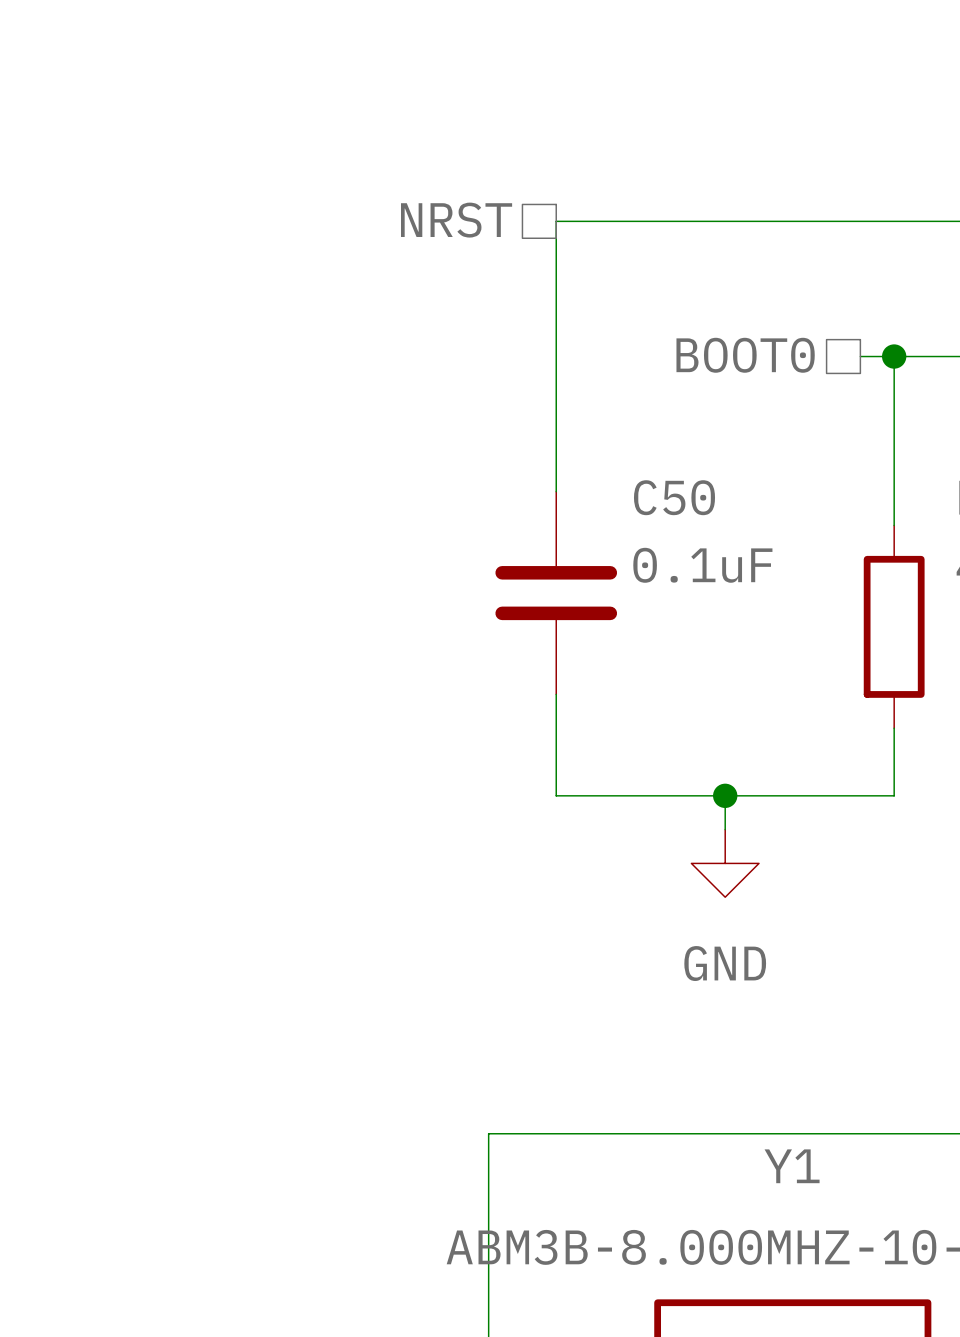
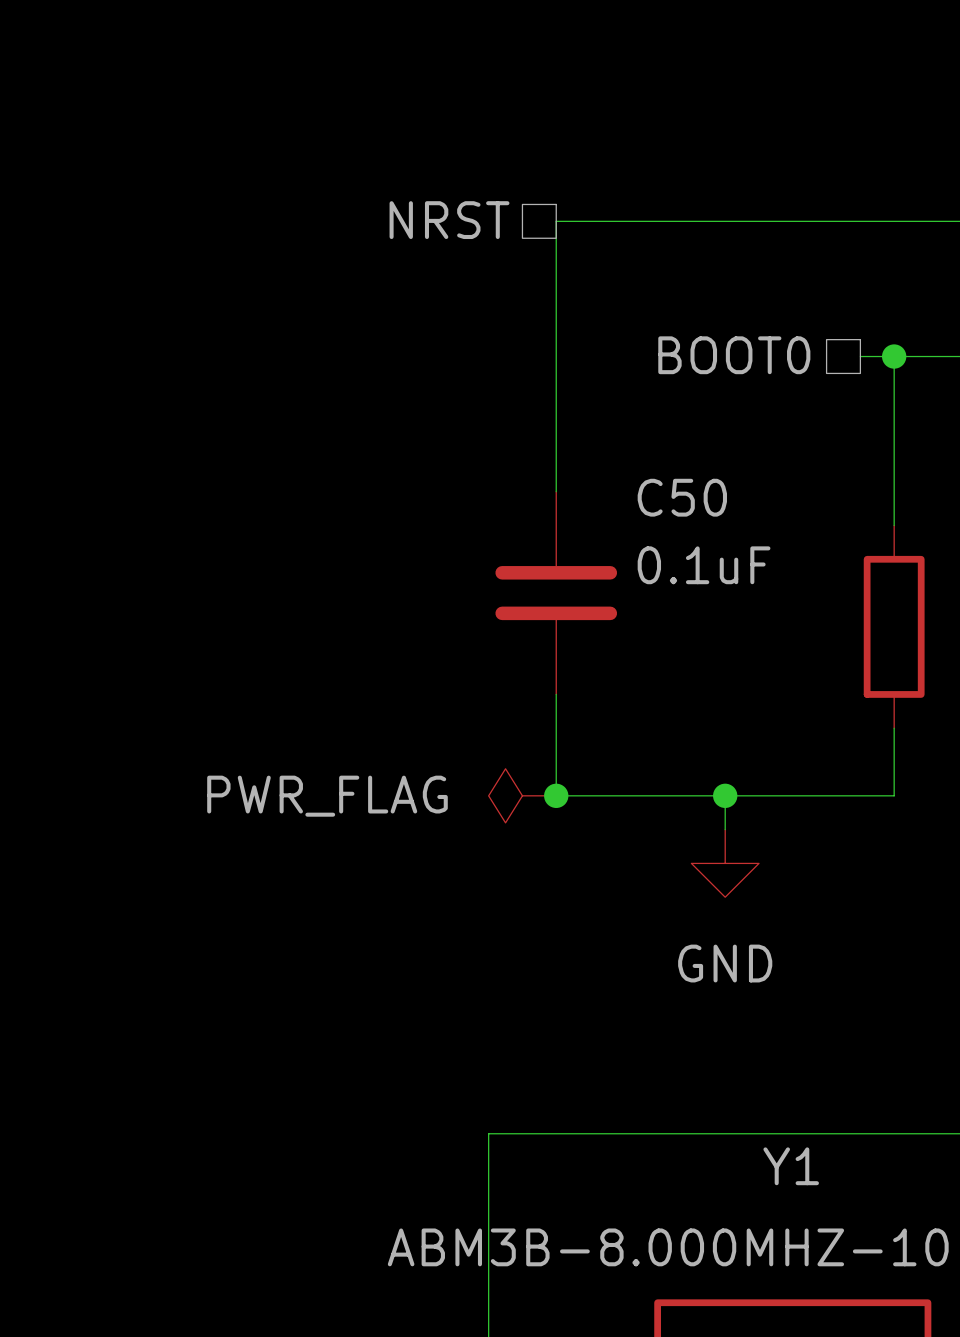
power symbol: none -> PWR_FLAG (522, 795)
junction: none -> (556, 795)

